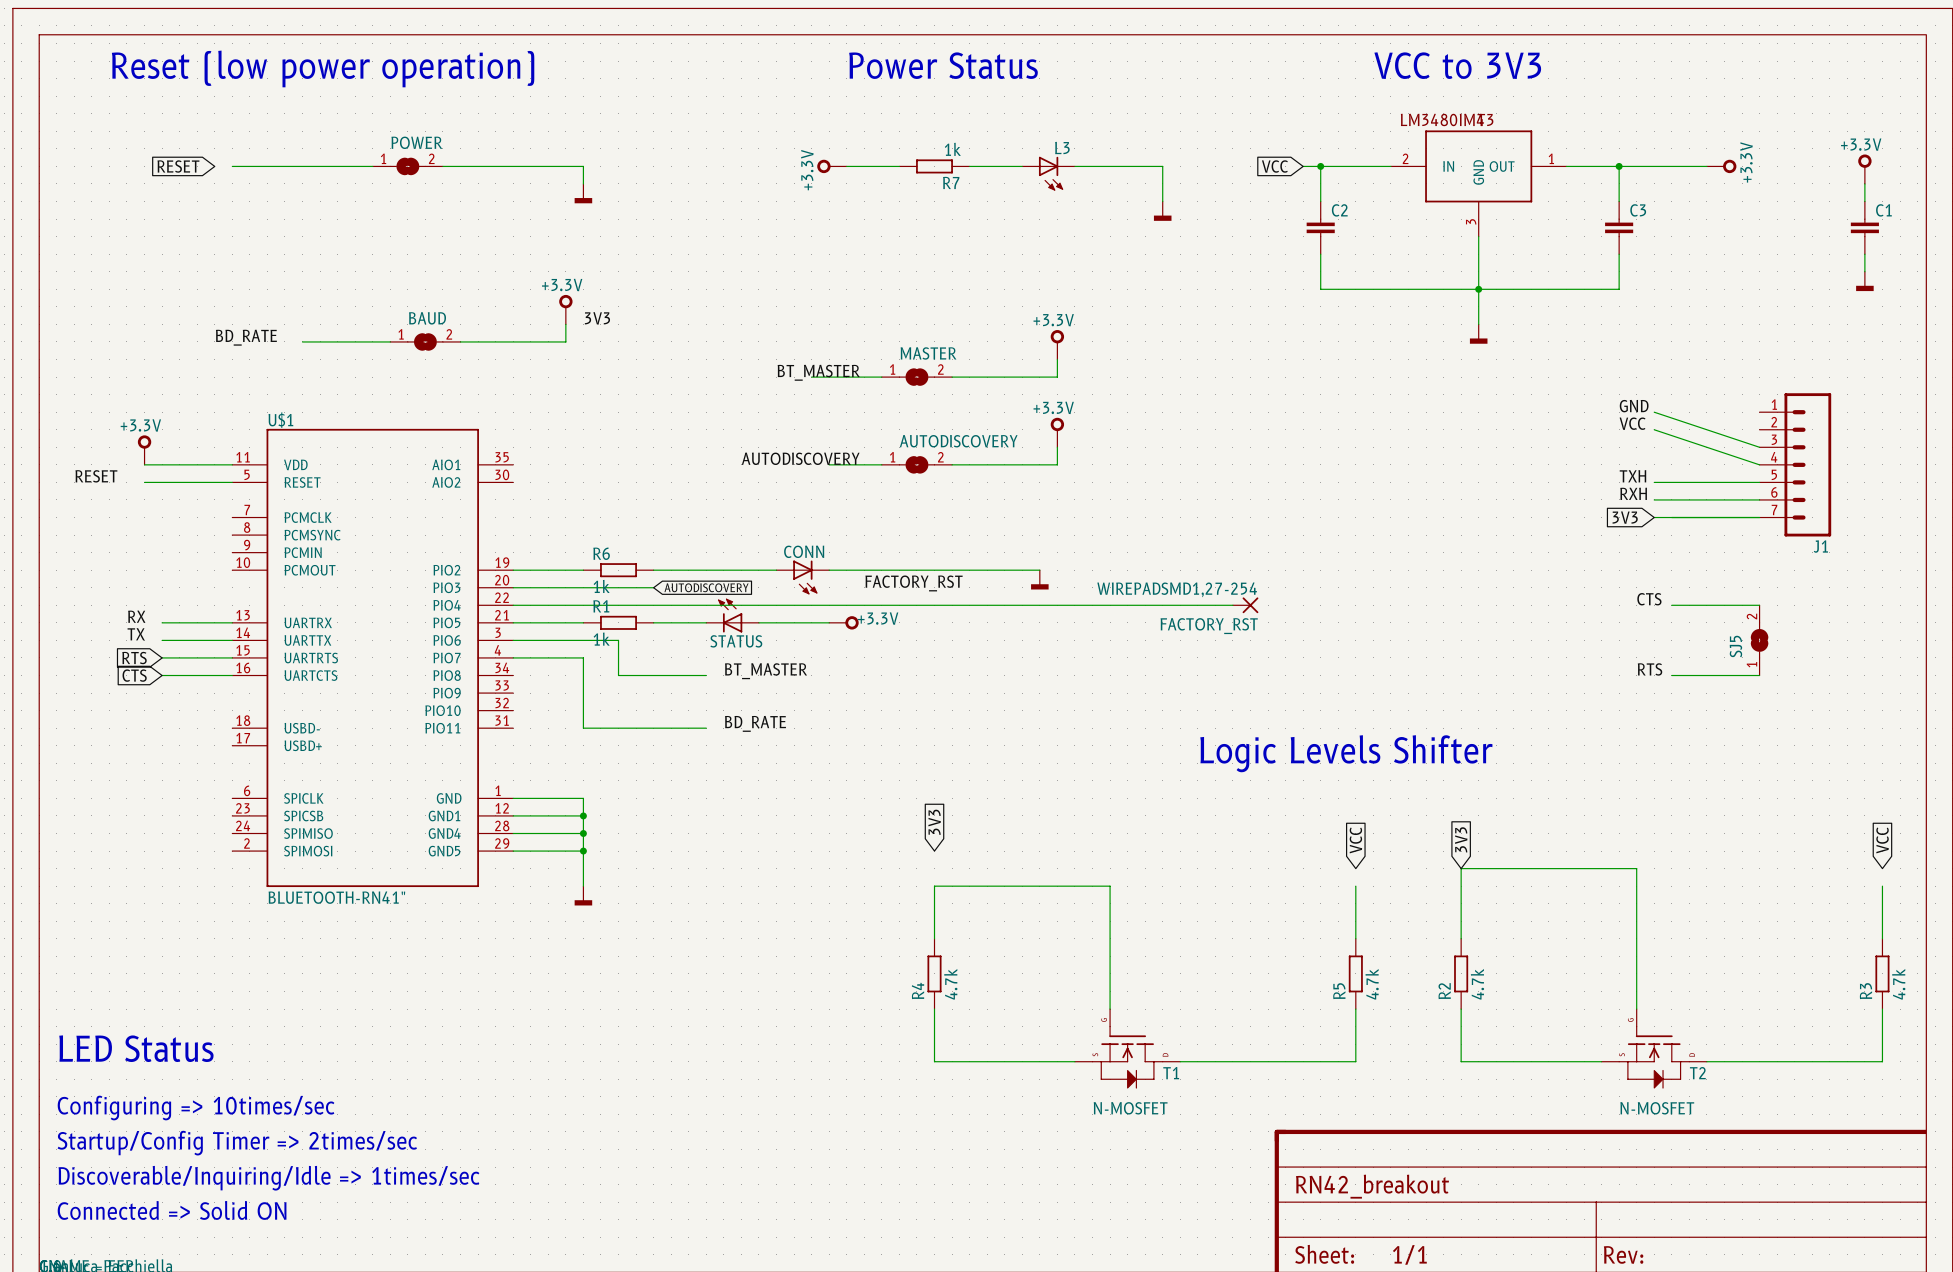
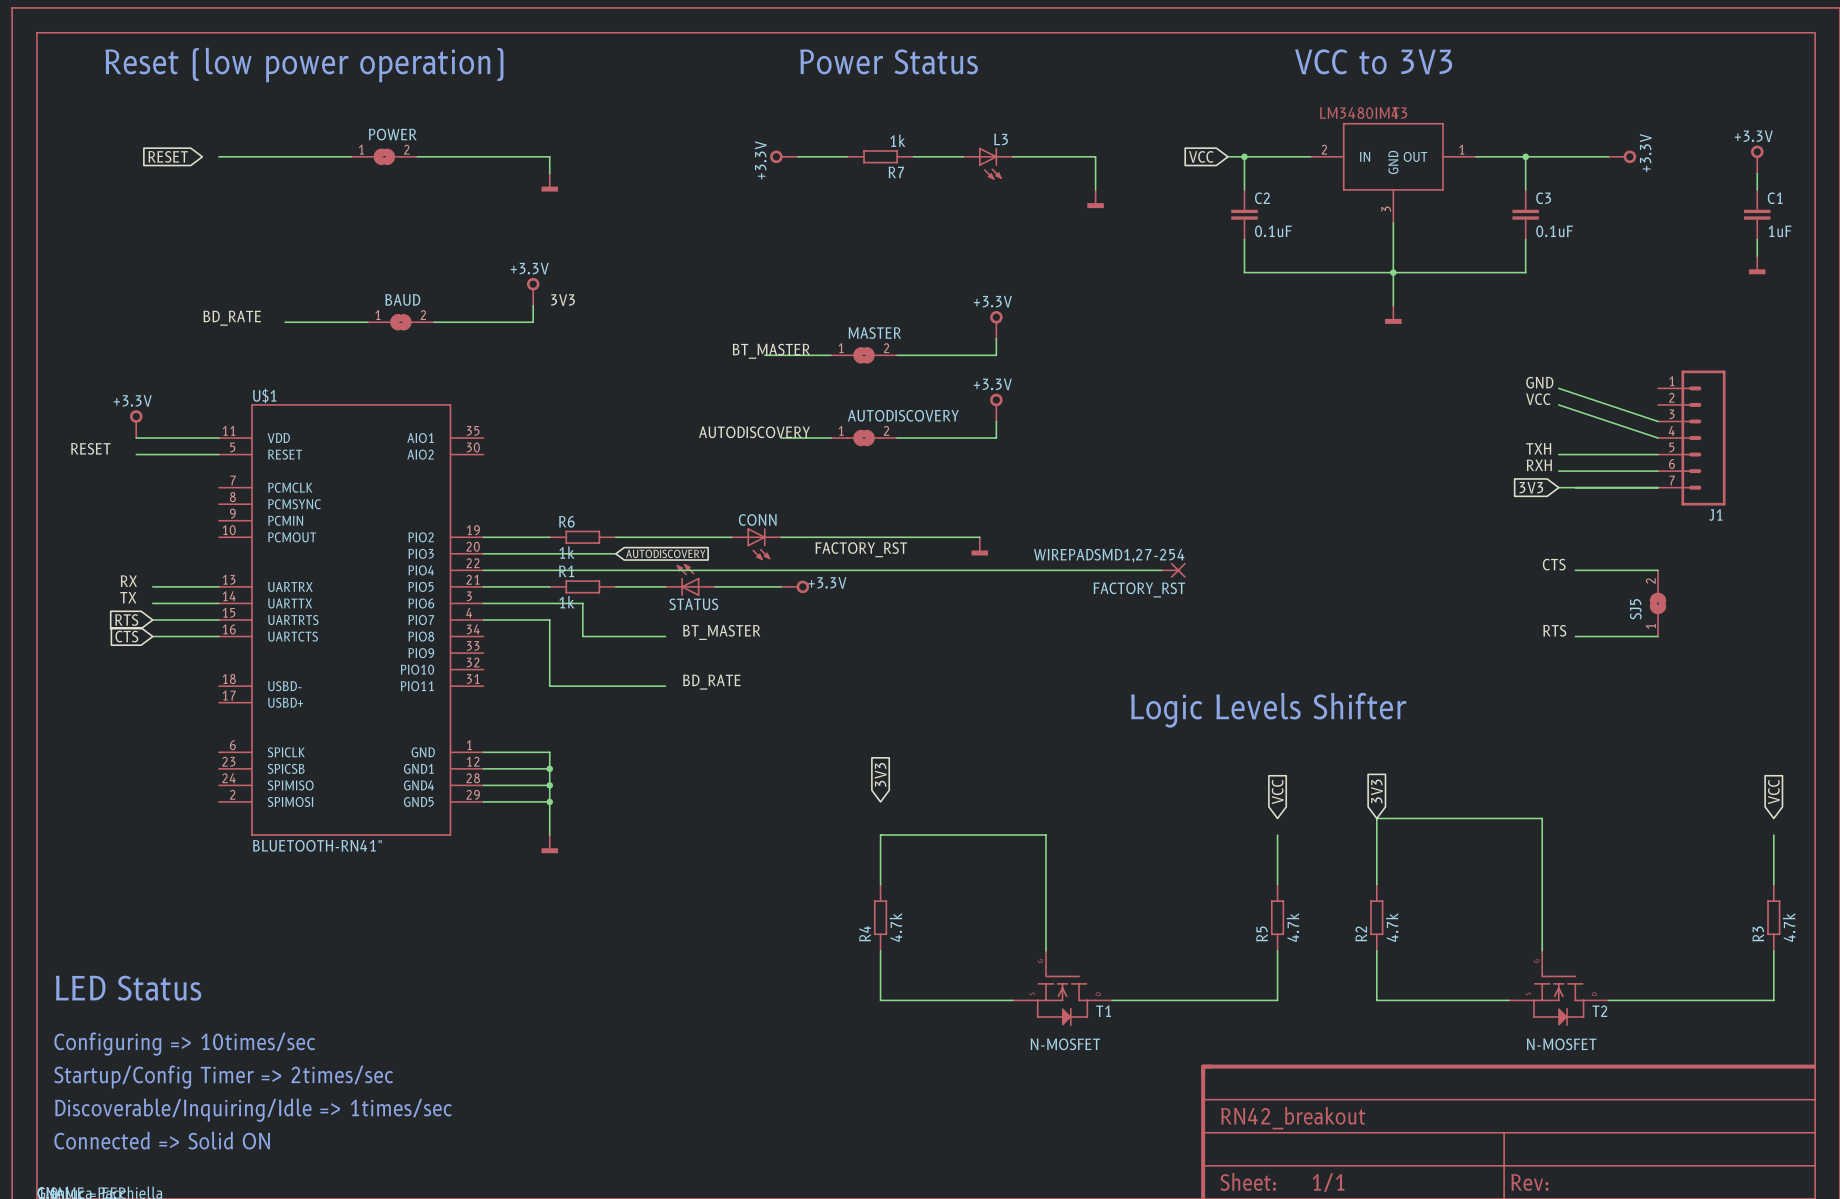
C2 value: none -> 0.1uF (1273, 231)
C3 value: none -> 0.1uF (1554, 231)
C1 value: none -> 1uF (1780, 231)

